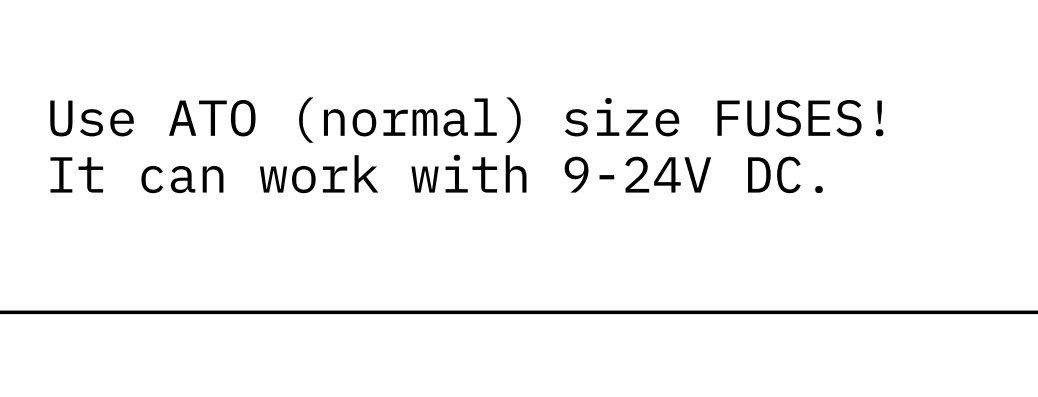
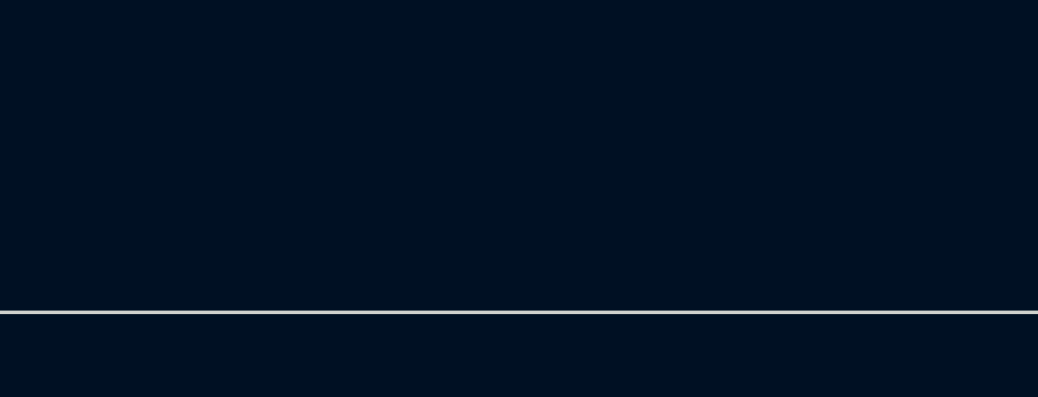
text: Use ATO (normal) size FUSES! (466, 120) -> none
text: It can work with 9-24V DC. (436, 173) -> none

